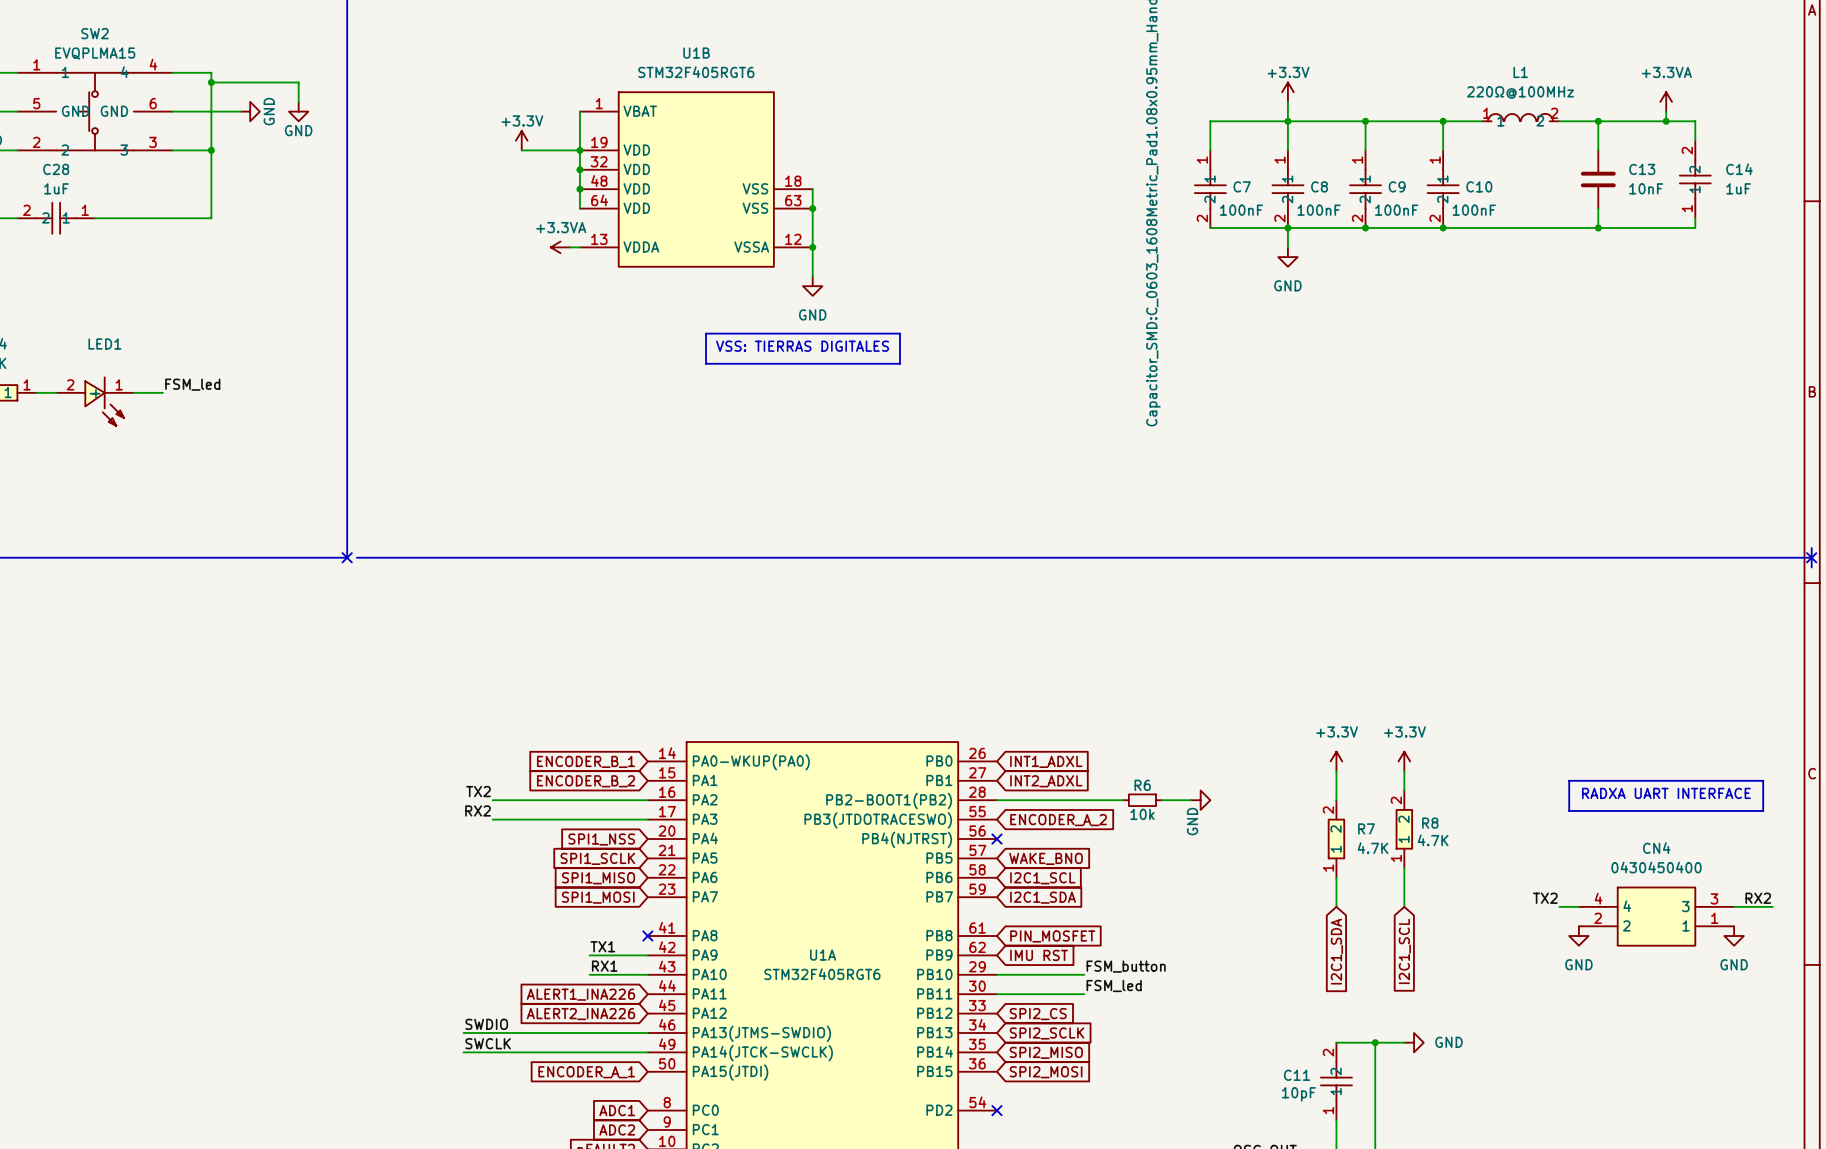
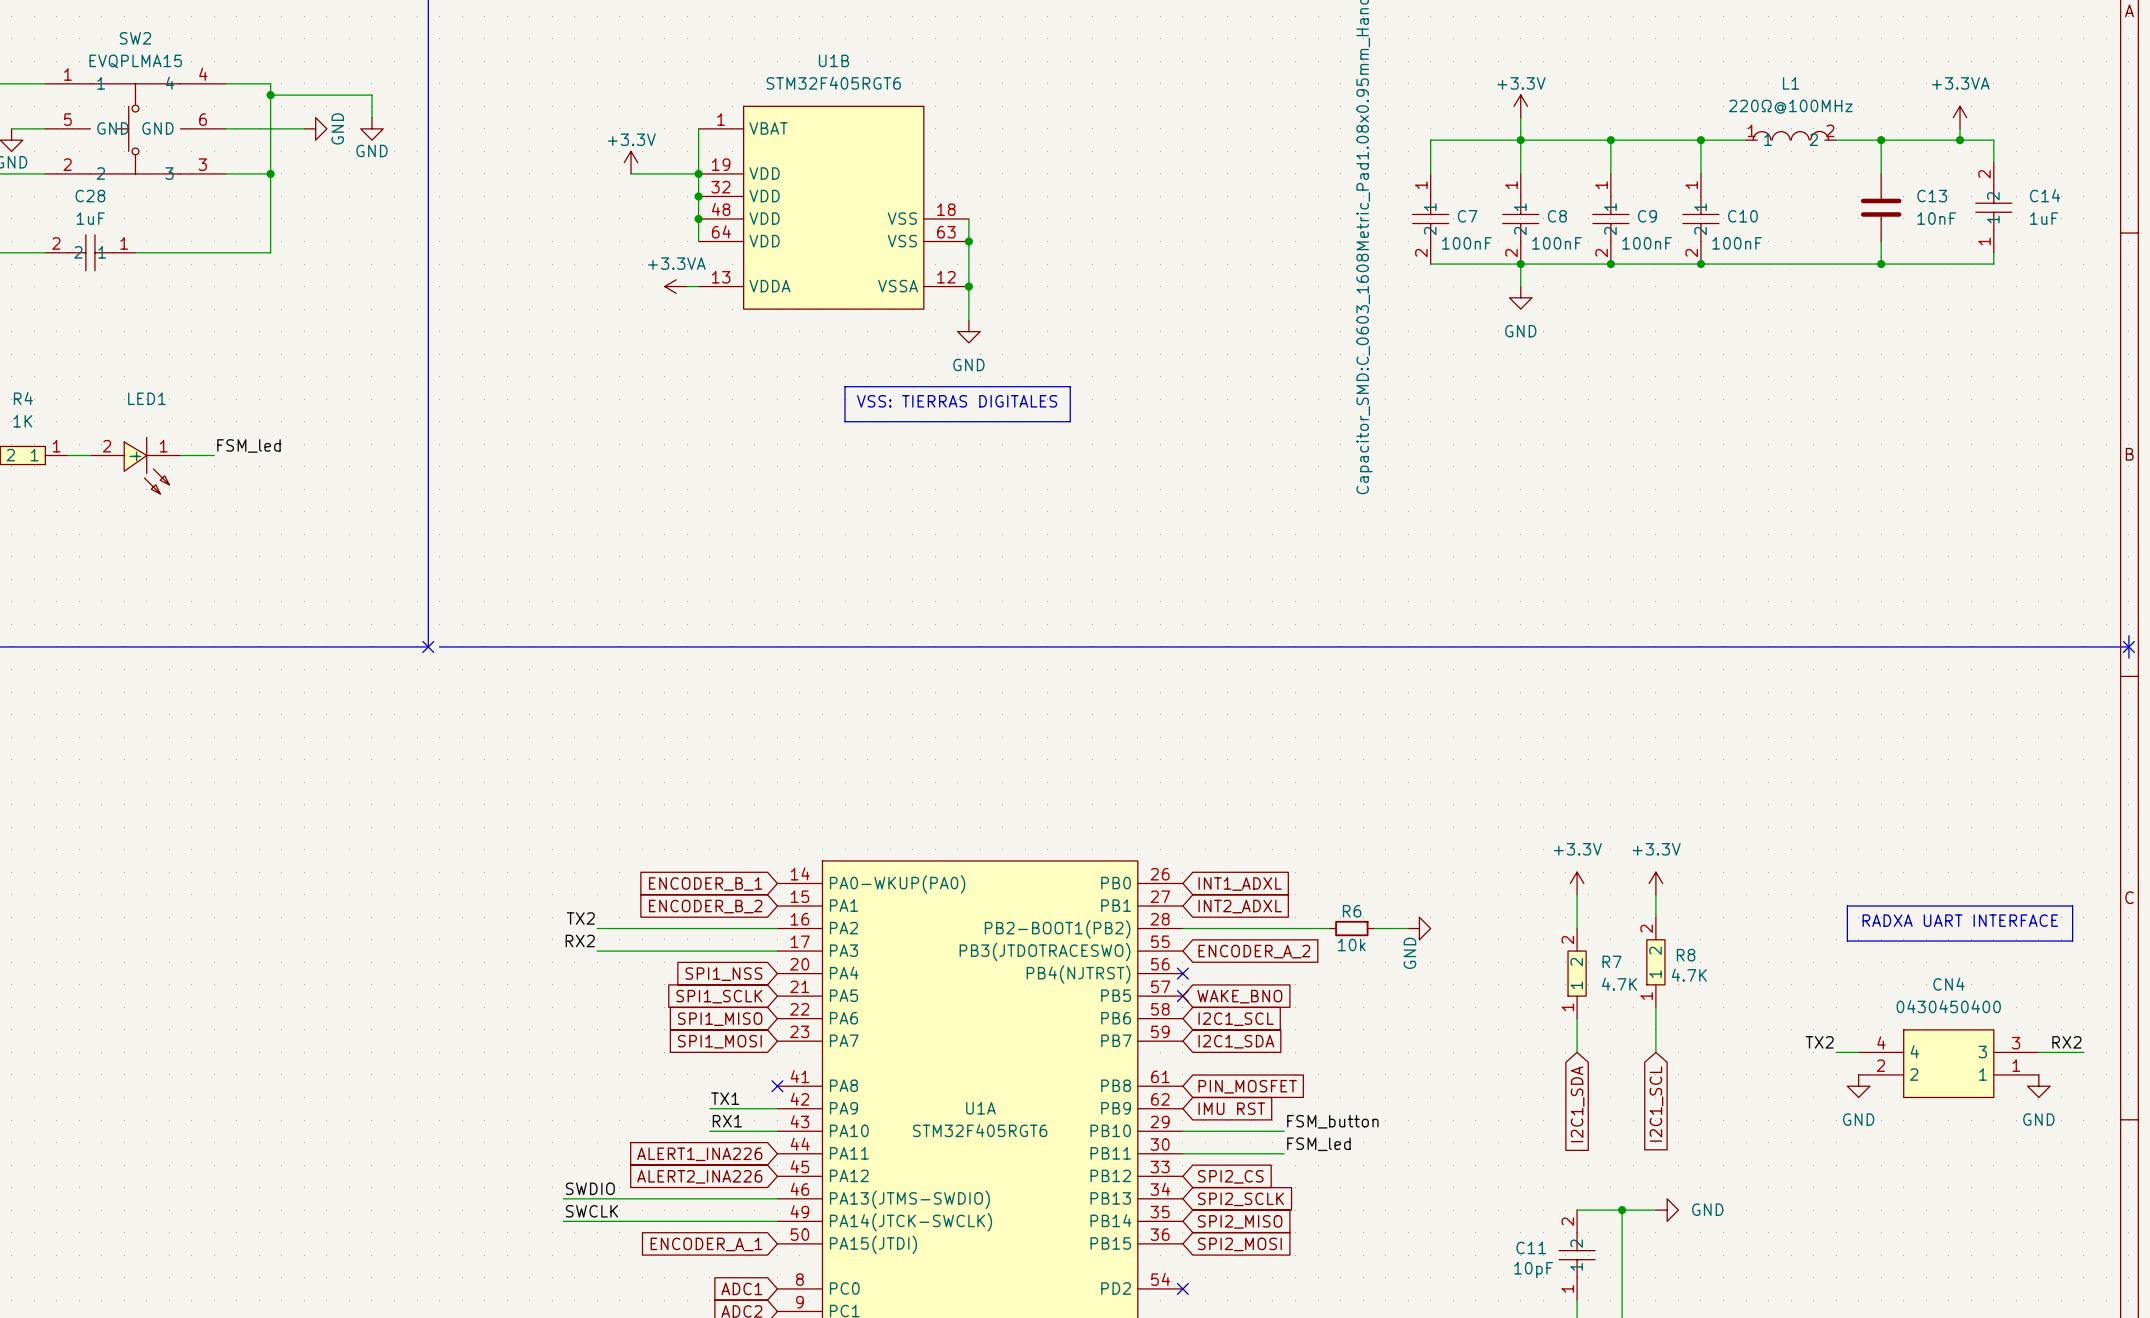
no-connect mark: none -> (1182, 996)

